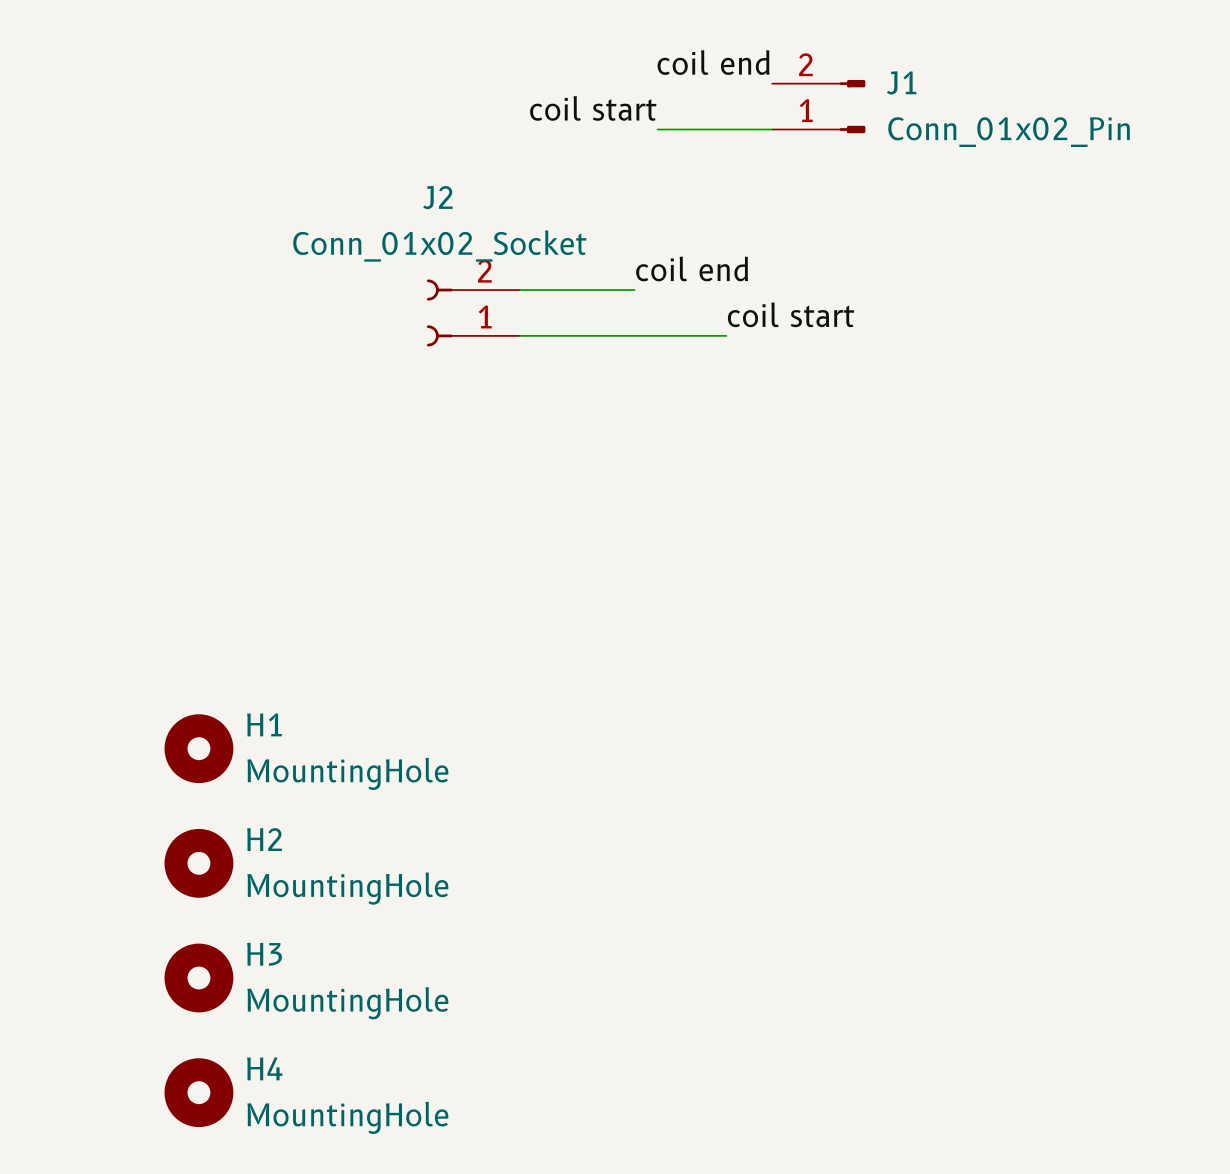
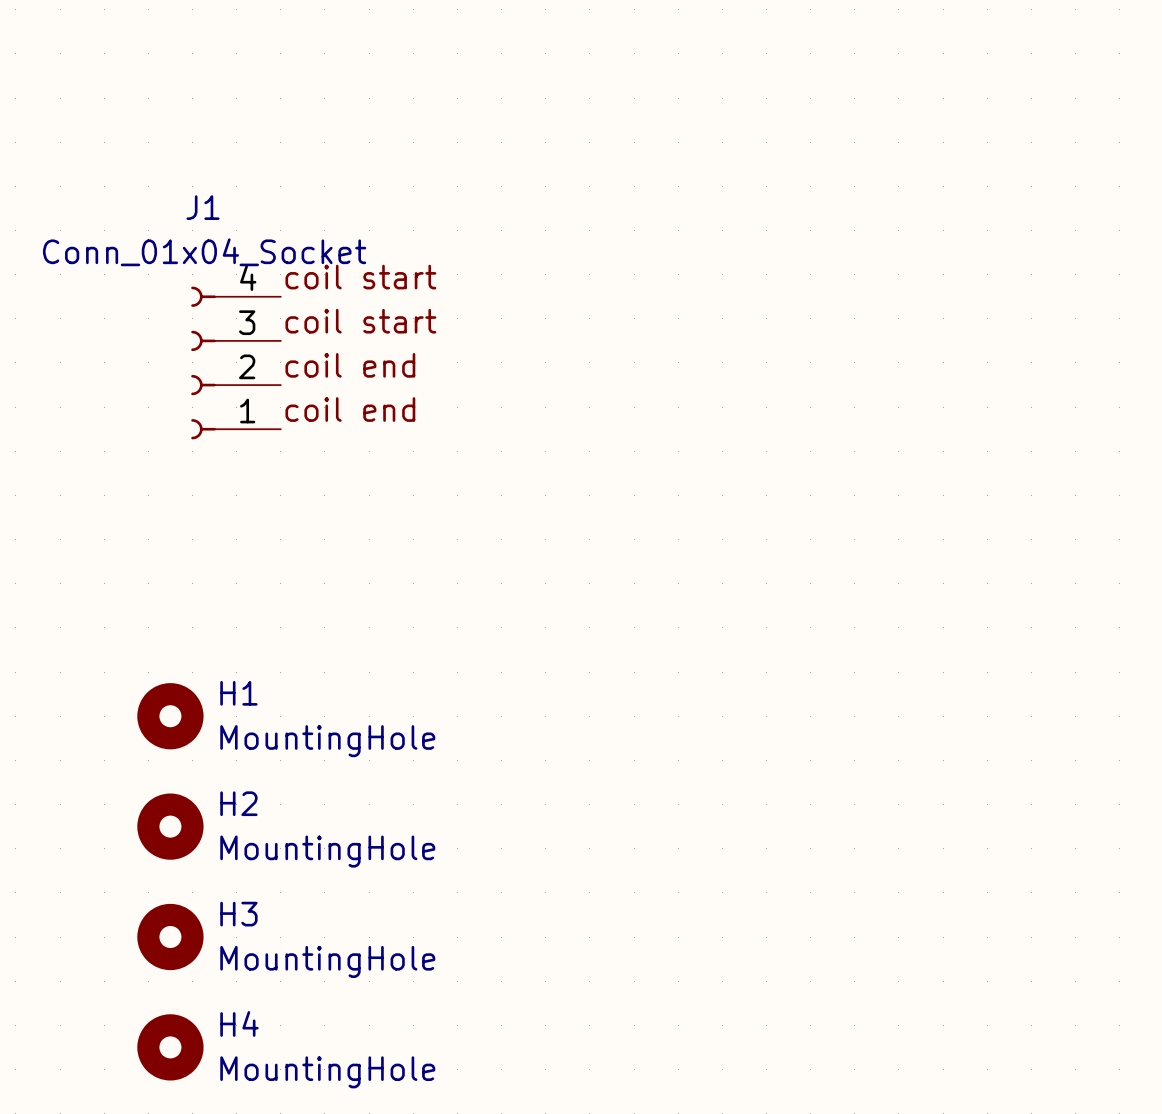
label: coil end (713, 62) -> none
J1 symbol: [772, 79, 866, 134] -> [191, 286, 281, 440]
J1 name position: J1 (901, 82) -> J1 (203, 207)
label: coil start (593, 108) -> none
wire: (657, 129) (772, 129) -> none
J1 value: Conn_01x02_Pin (1009, 132) -> Conn_01x04_Socket (204, 252)
label: coil end (692, 268) -> none
wire: (519, 290) (634, 290) -> none
label: none -> coil start (360, 277)
J2: Conn_01x02_Socket (473, 312) -> none
label: coil start (791, 314) -> none
wire: (519, 335) (726, 335) -> none
label: none -> coil start (360, 321)
label: none -> coil end (350, 365)
label: none -> coil end (350, 409)

